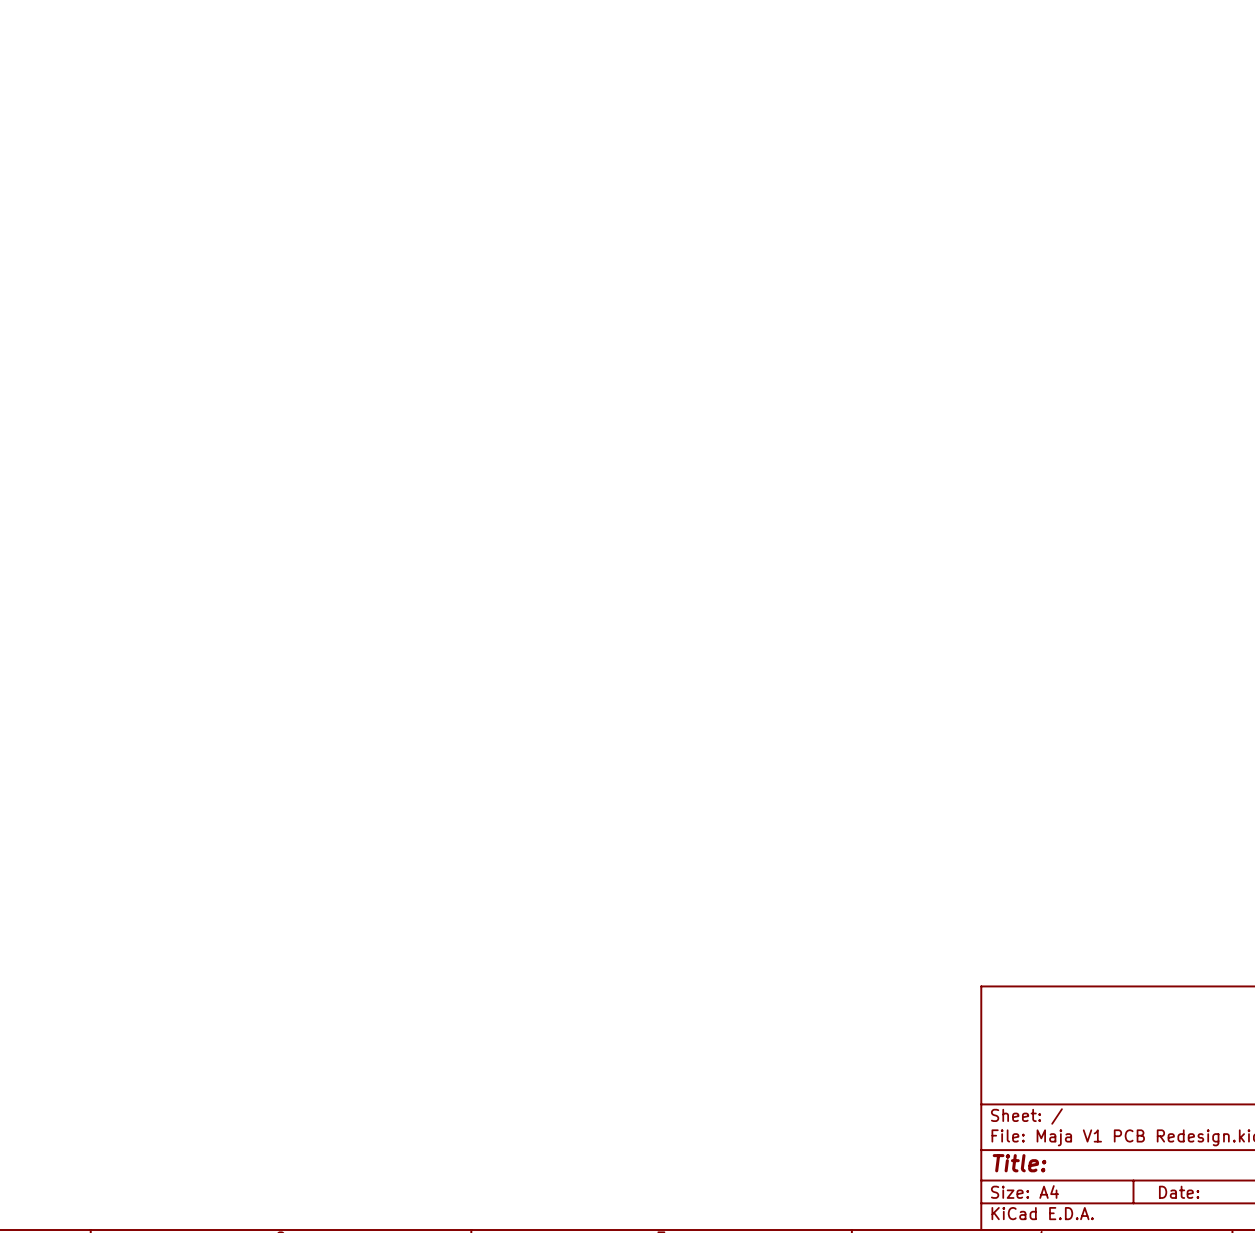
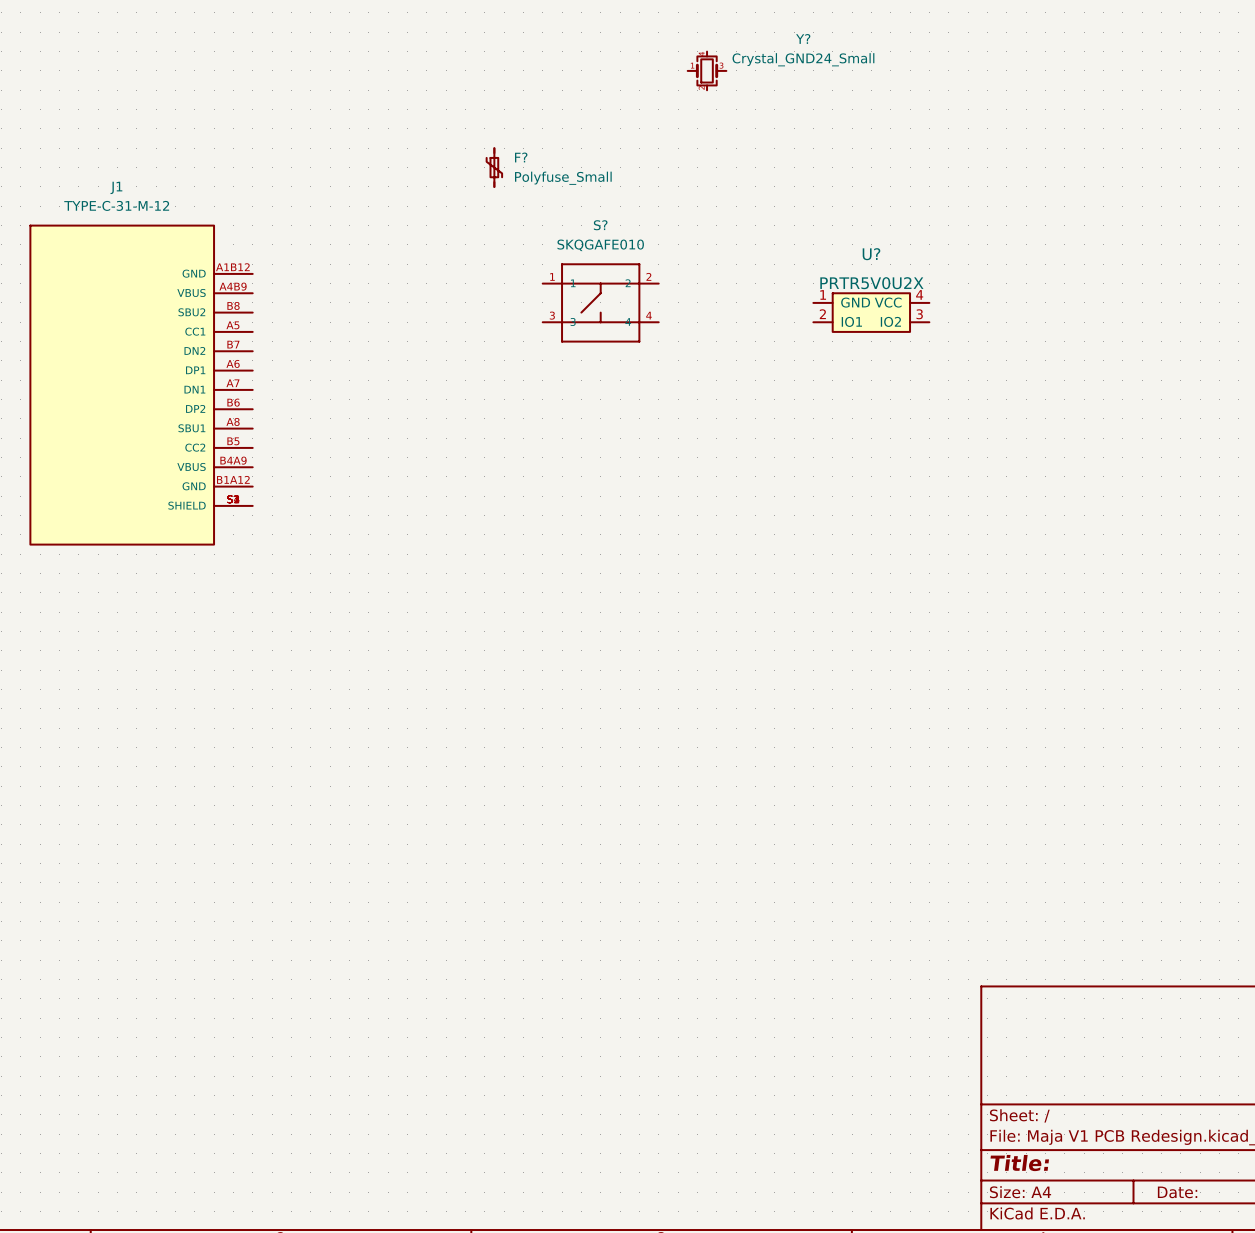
Y?: none -> Crystal_GND24_Small (707, 70)
F?: none -> Polyfuse_Small (494, 167)
S?: none -> SKQGAFE010 (600, 302)
U?: none -> PRTR5V0U2X (871, 312)
J1: none -> TYPE-C-31-M-12 (141, 385)

